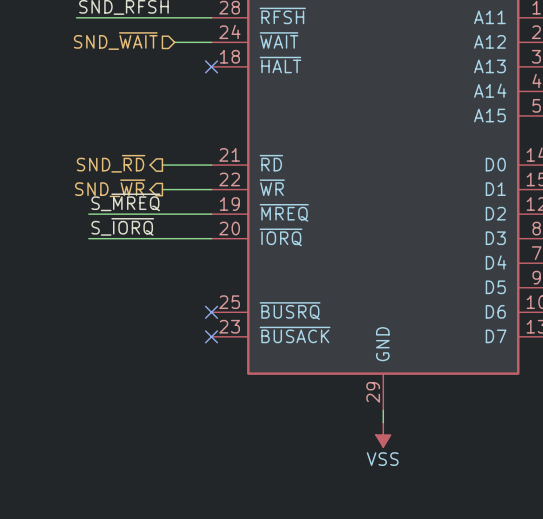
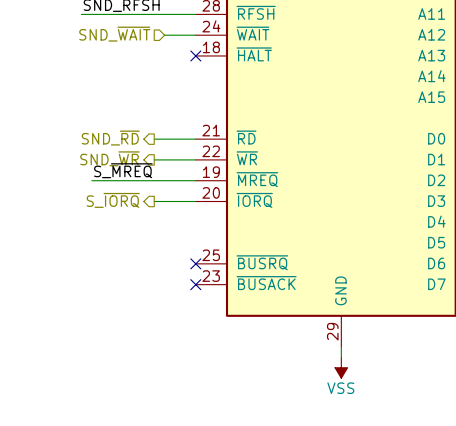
label: S_~{IORQ} (122, 226) -> none
hierarchical label: none -> S_~{IORQ} (113, 200)
wire: (88, 238) (162, 238) -> none

